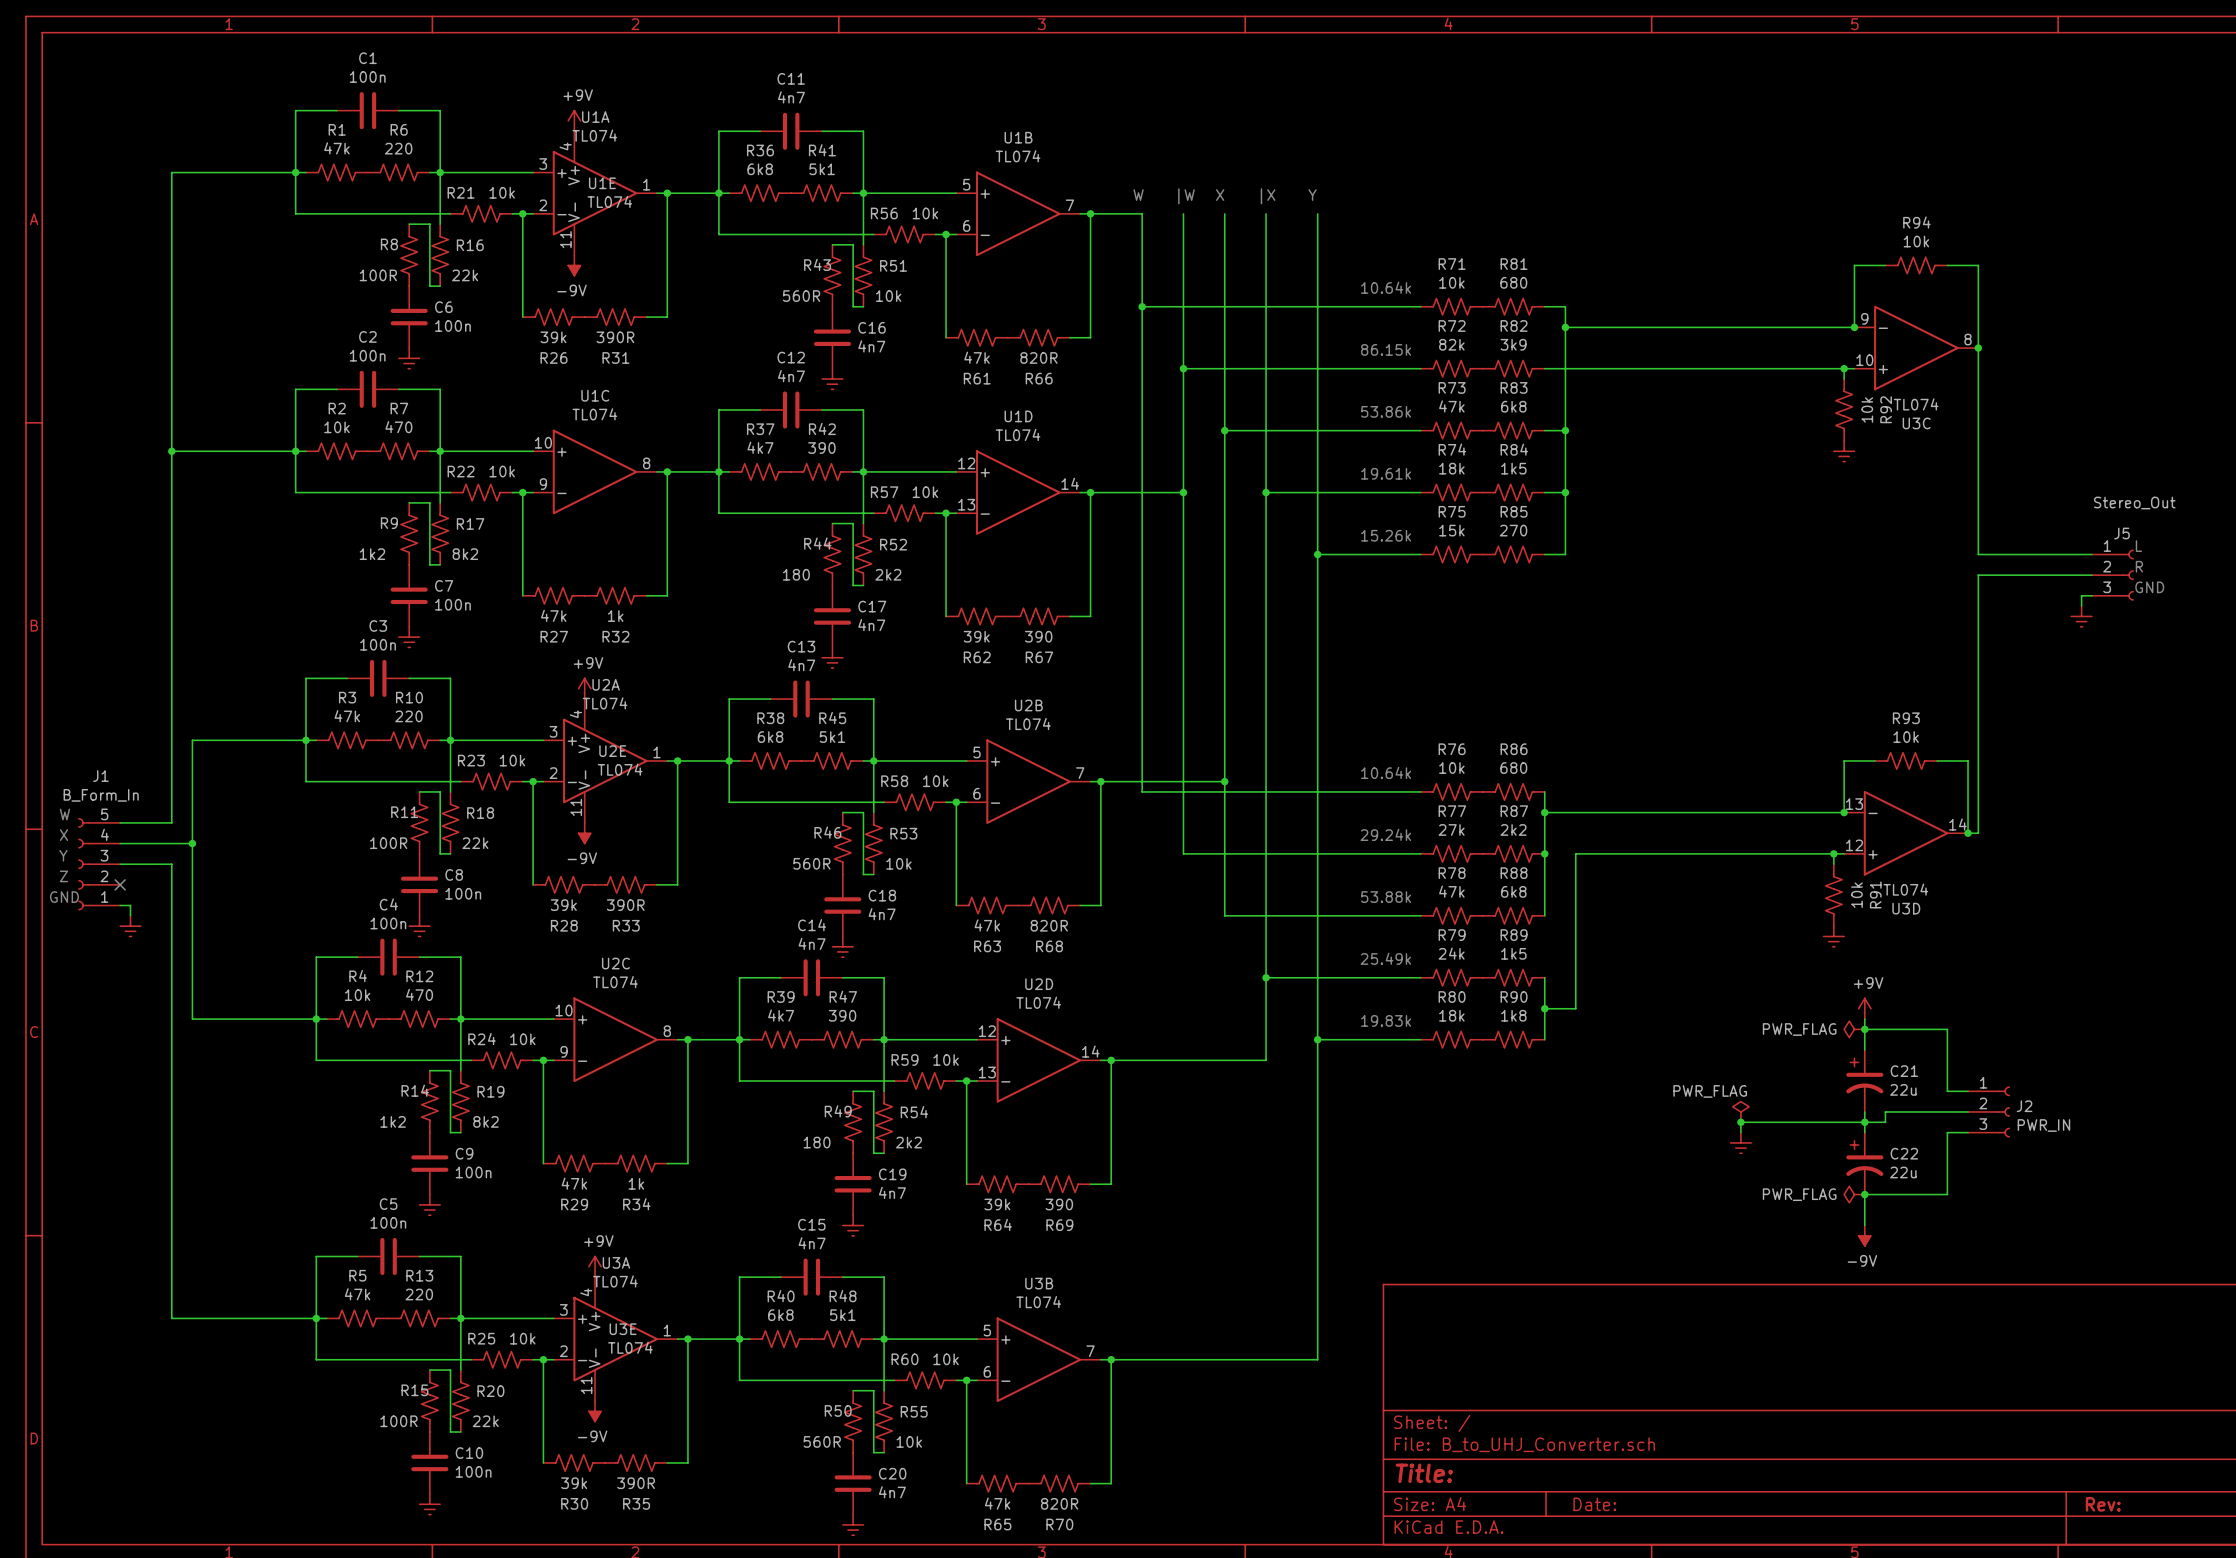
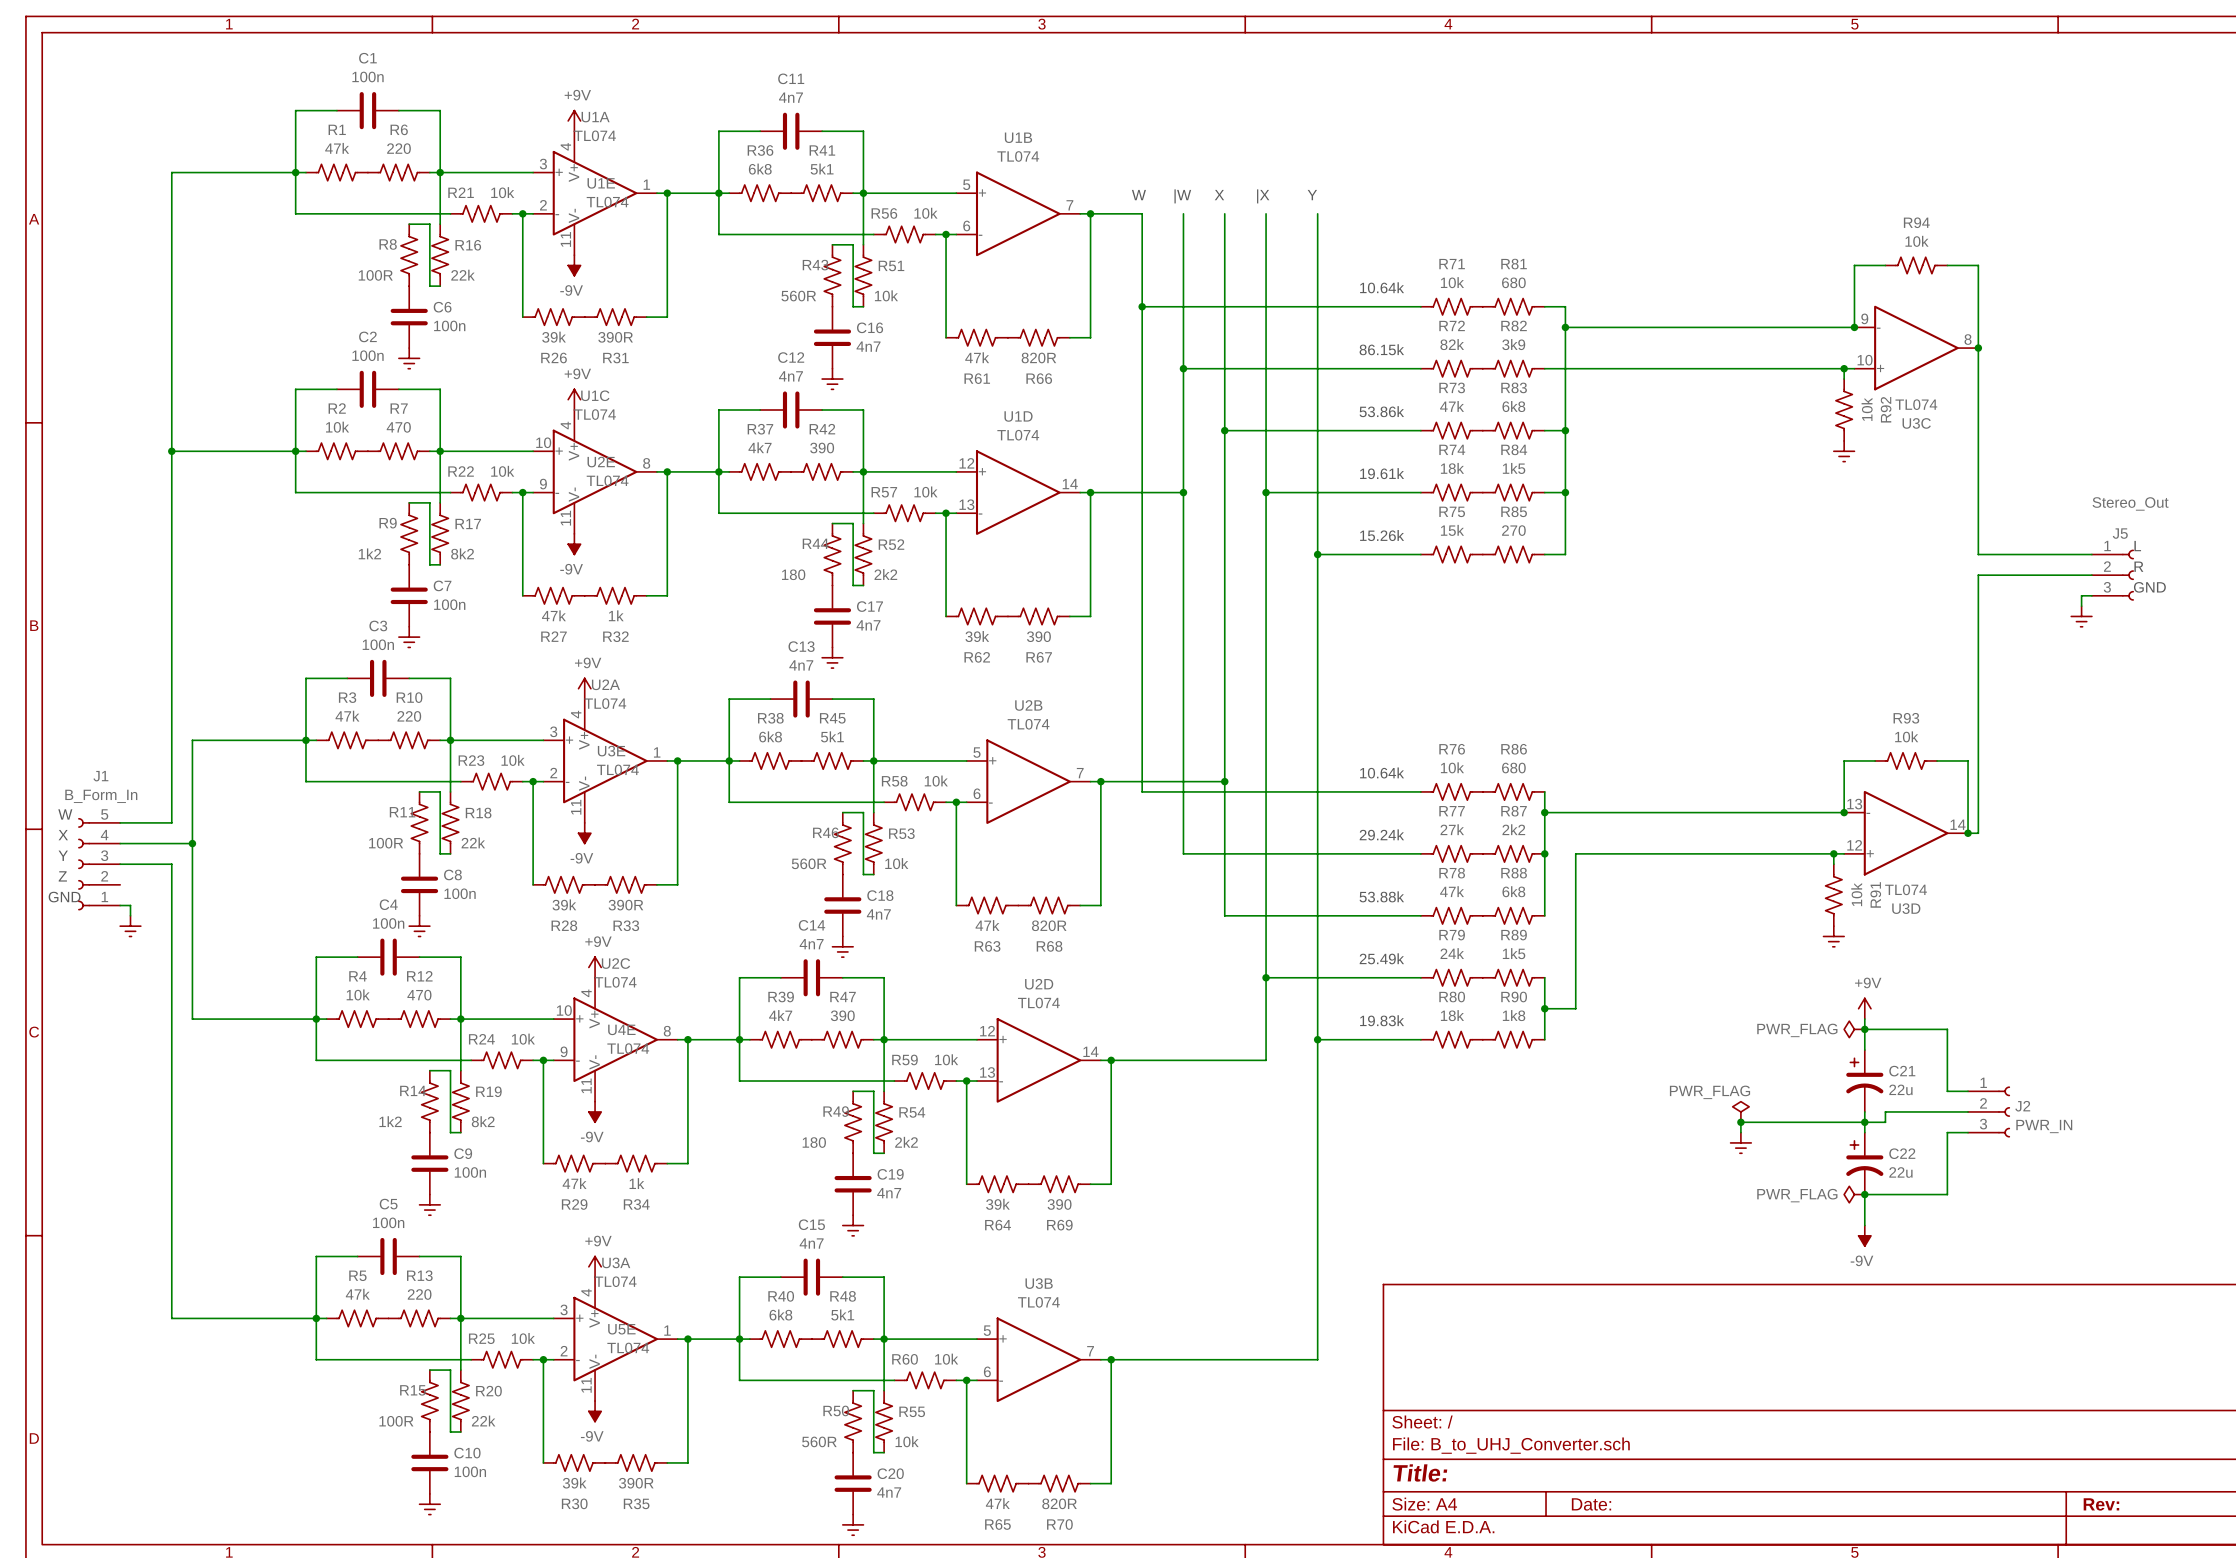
power symbol: none -> +9V (574, 399)
U2E: none -> TL074 (574, 471)
power symbol: none -> -9V (574, 544)
U2E name: U2E (612, 751) -> U3E (611, 751)
no-connect mark: (120, 884) -> none
power symbol: none -> +9V (595, 967)
U4E: none -> TL074 (595, 1039)
power symbol: none -> -9V (595, 1111)
U3E name: U3E (623, 1329) -> U5E (621, 1329)

